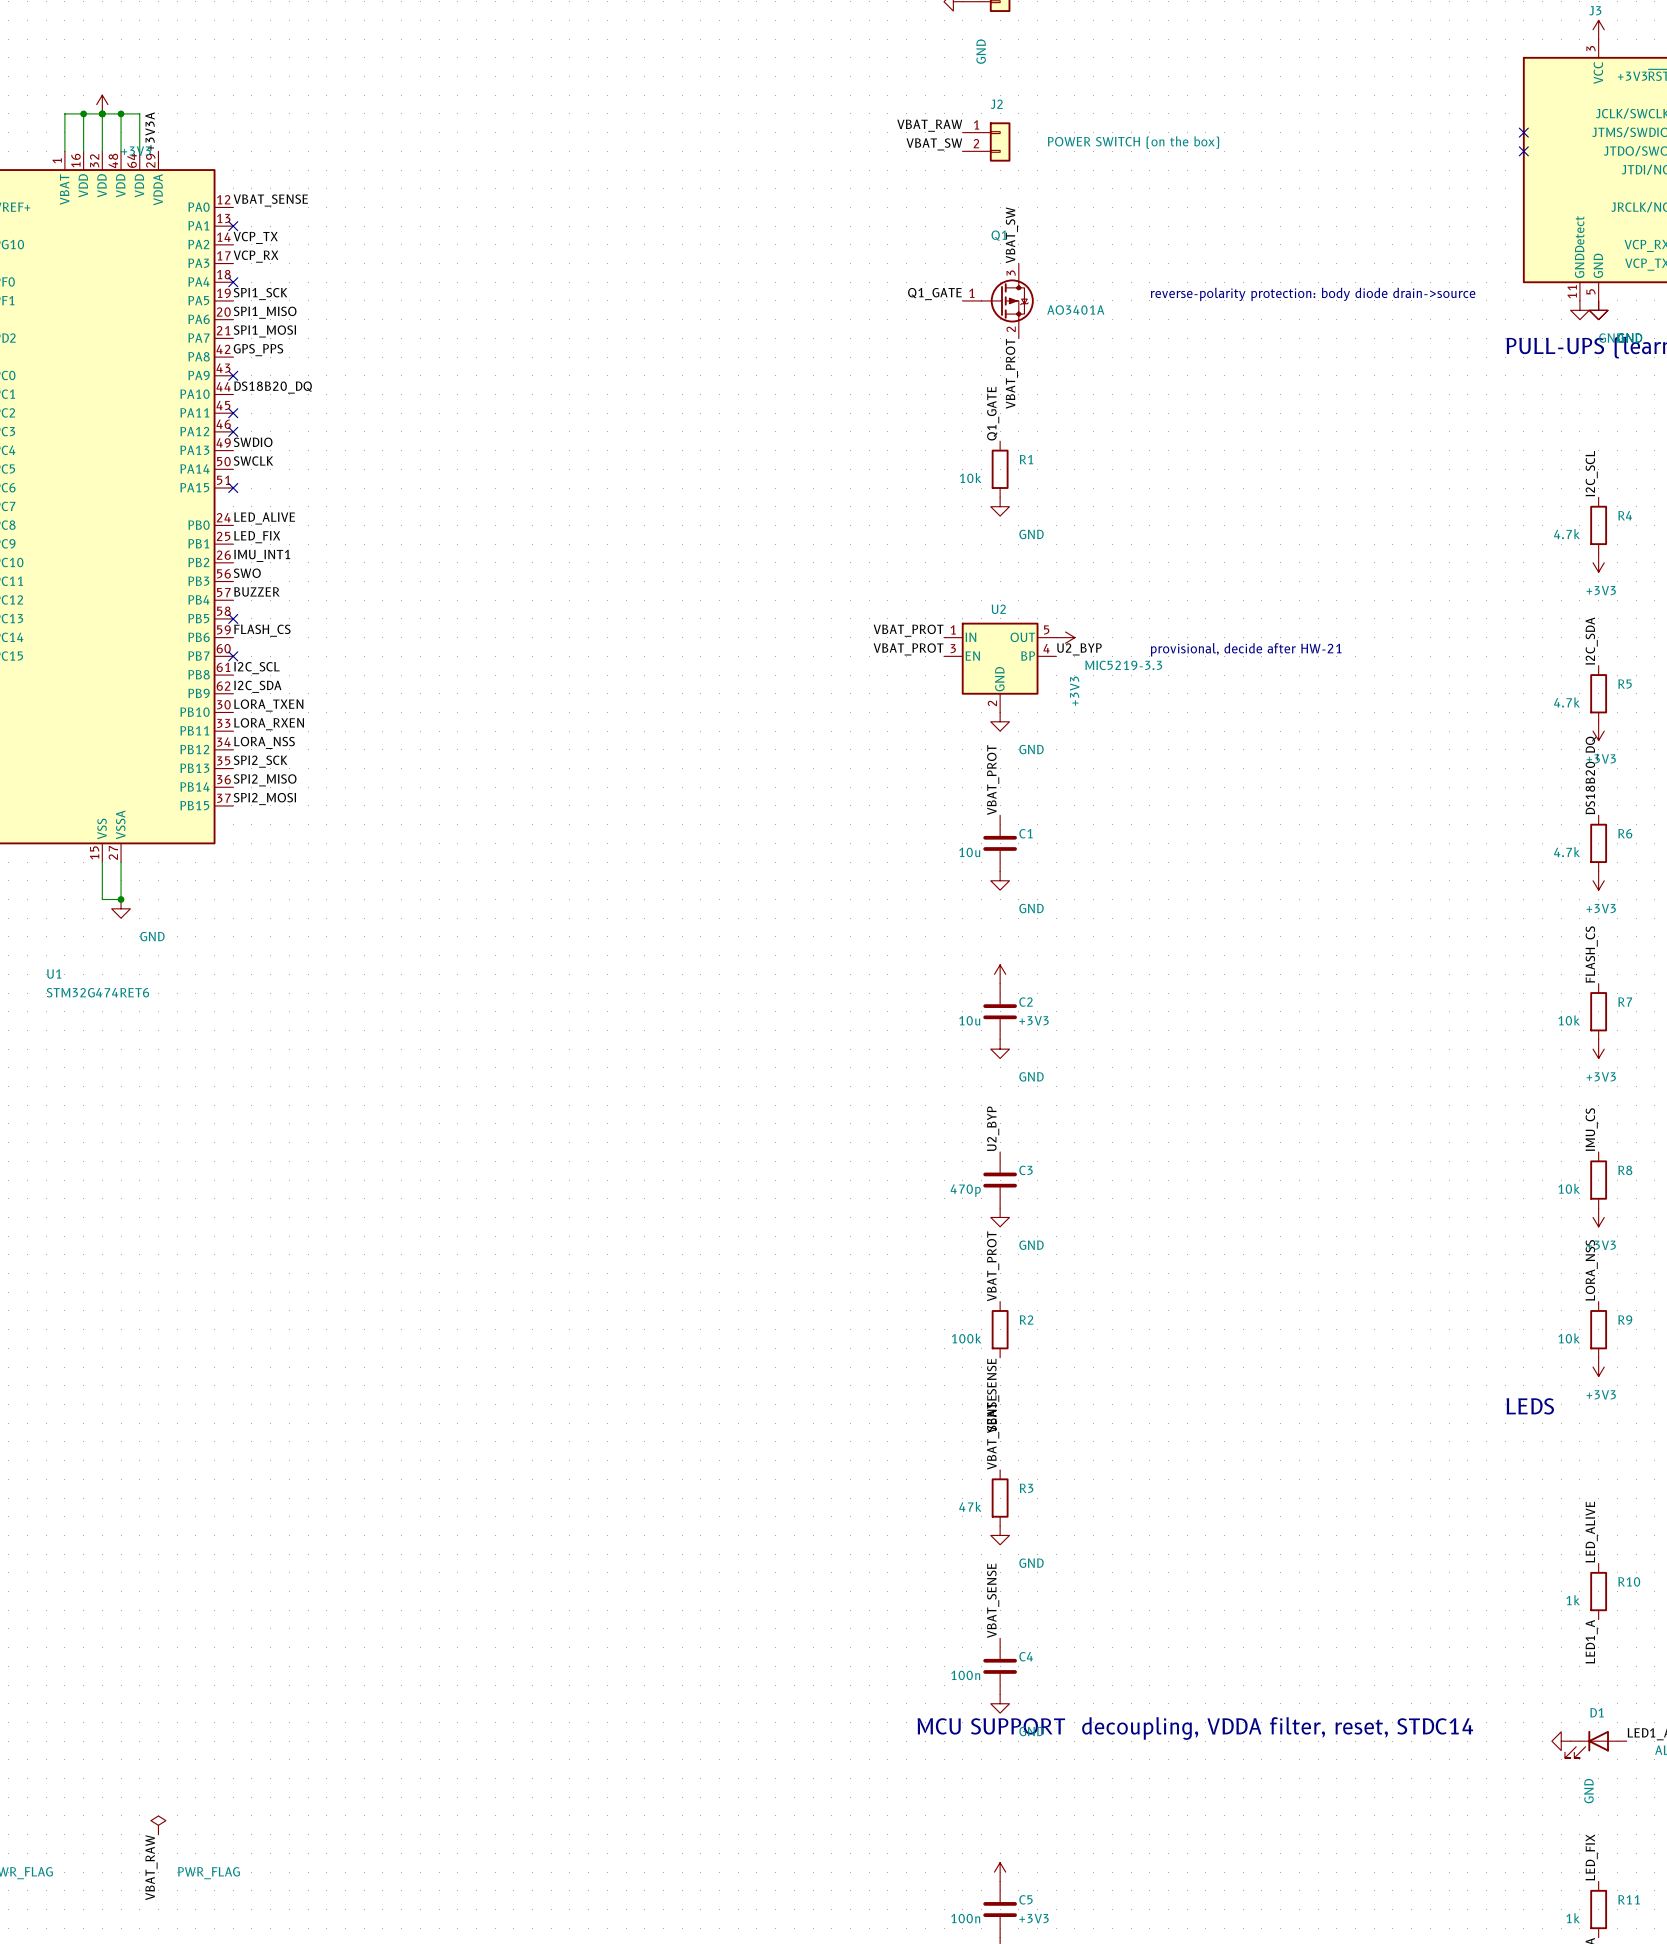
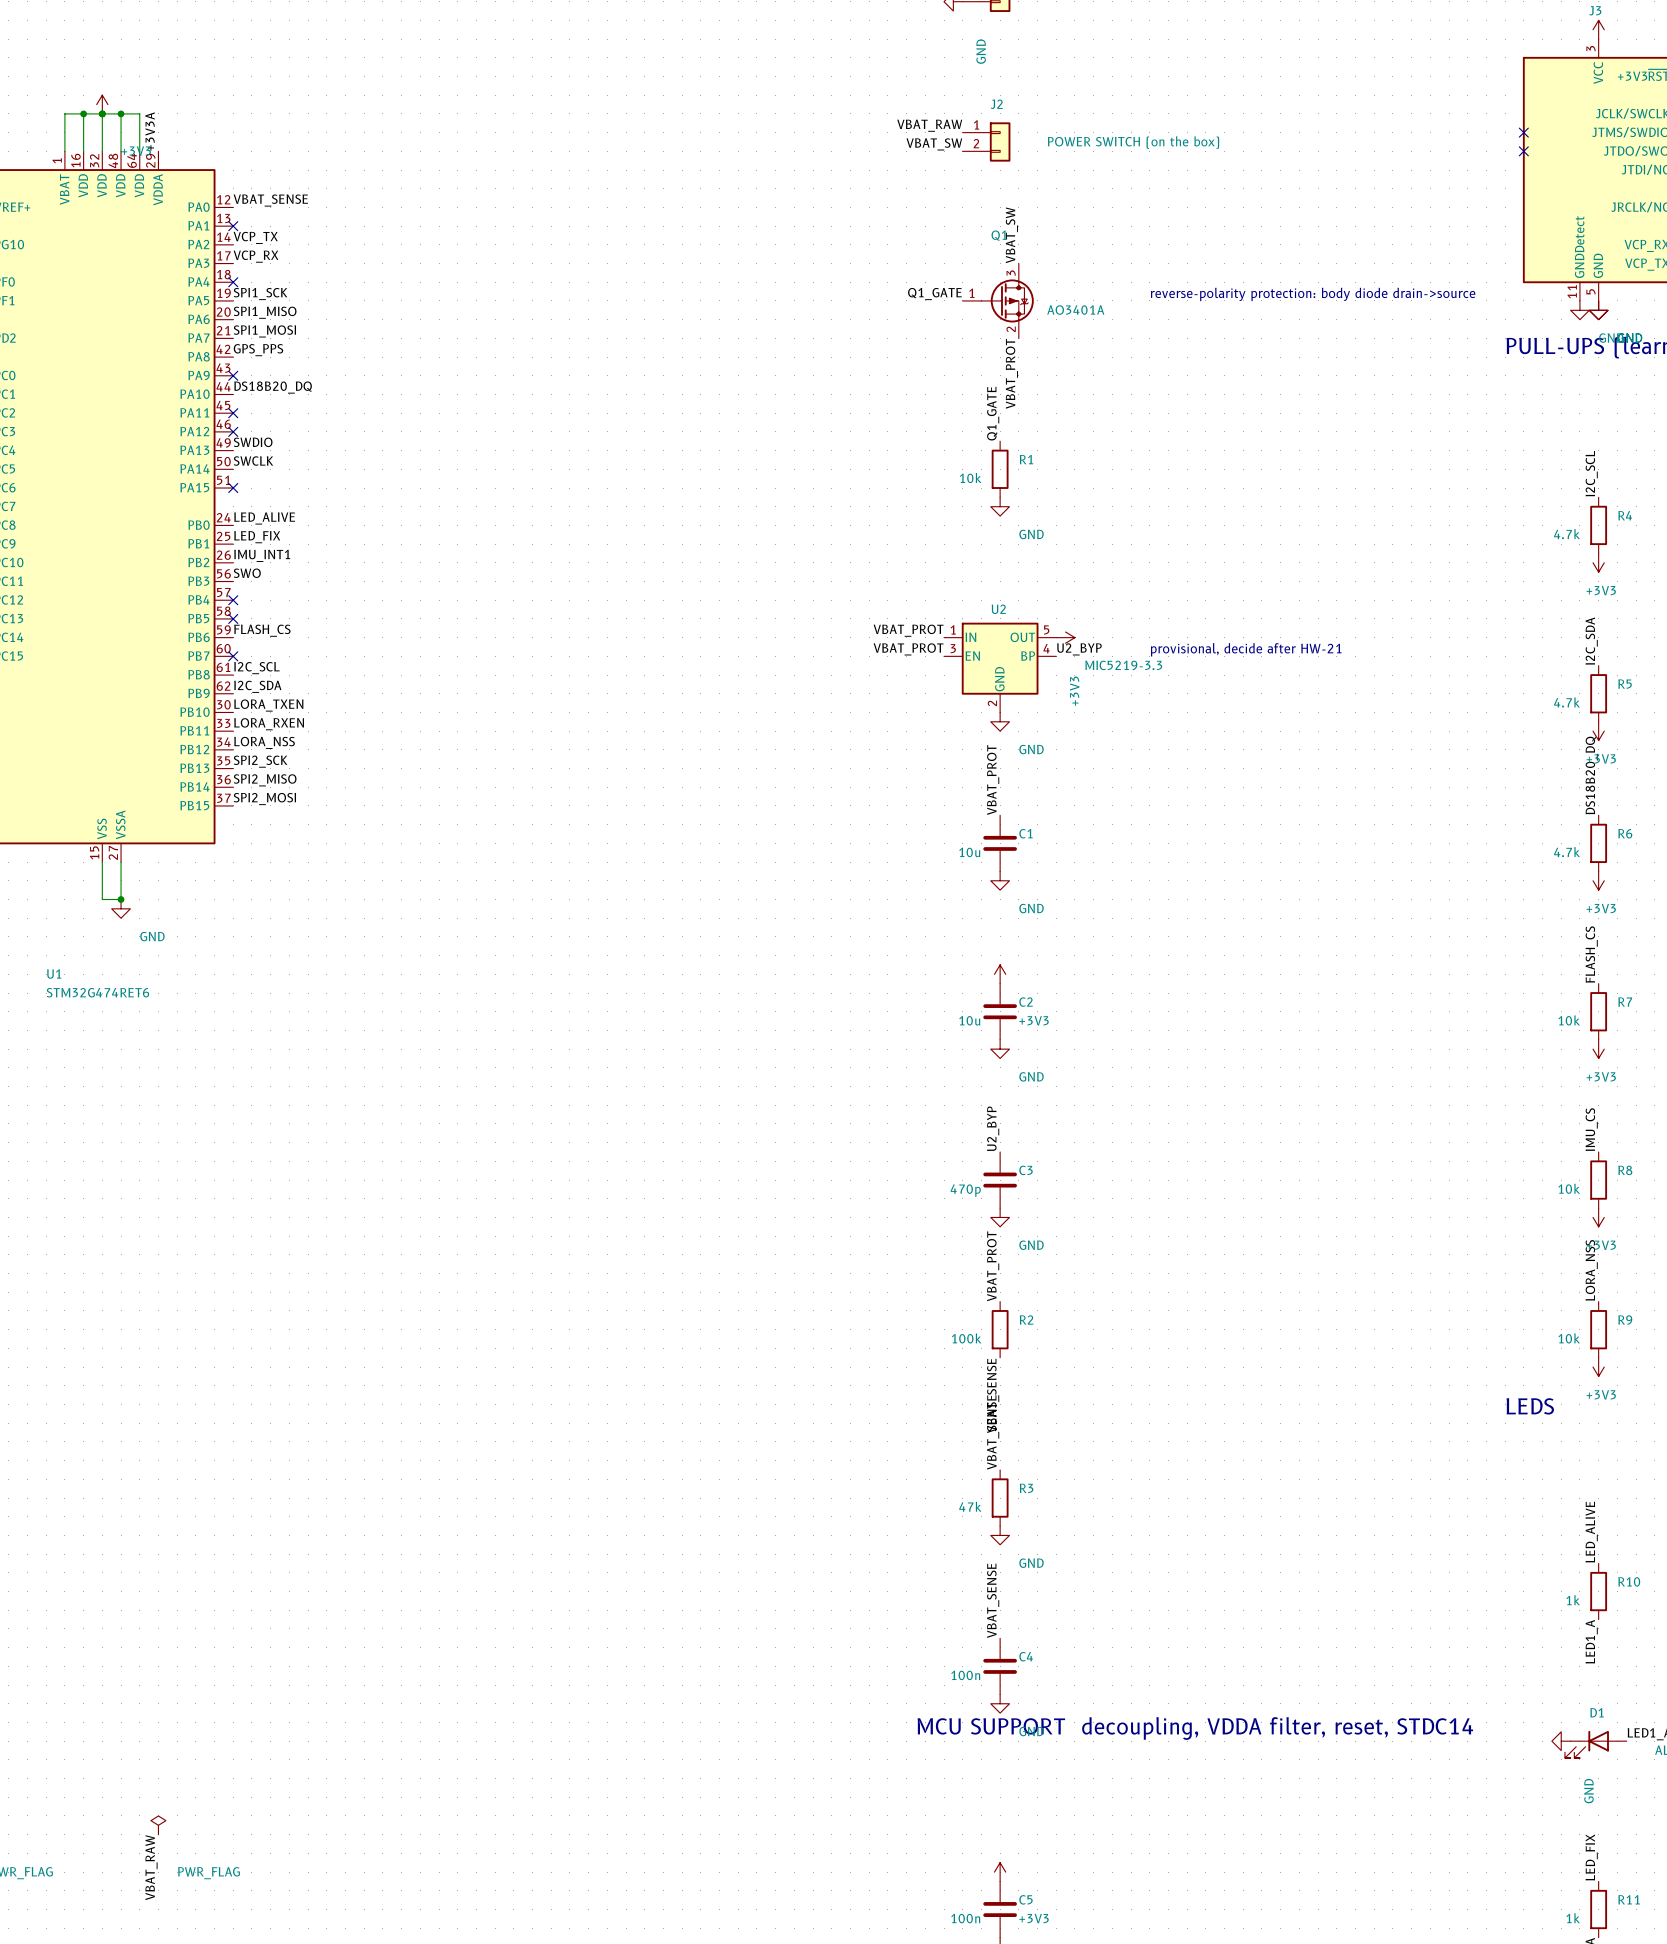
label: BUZZER (256, 591) -> none
no-connect mark: none -> (233, 600)

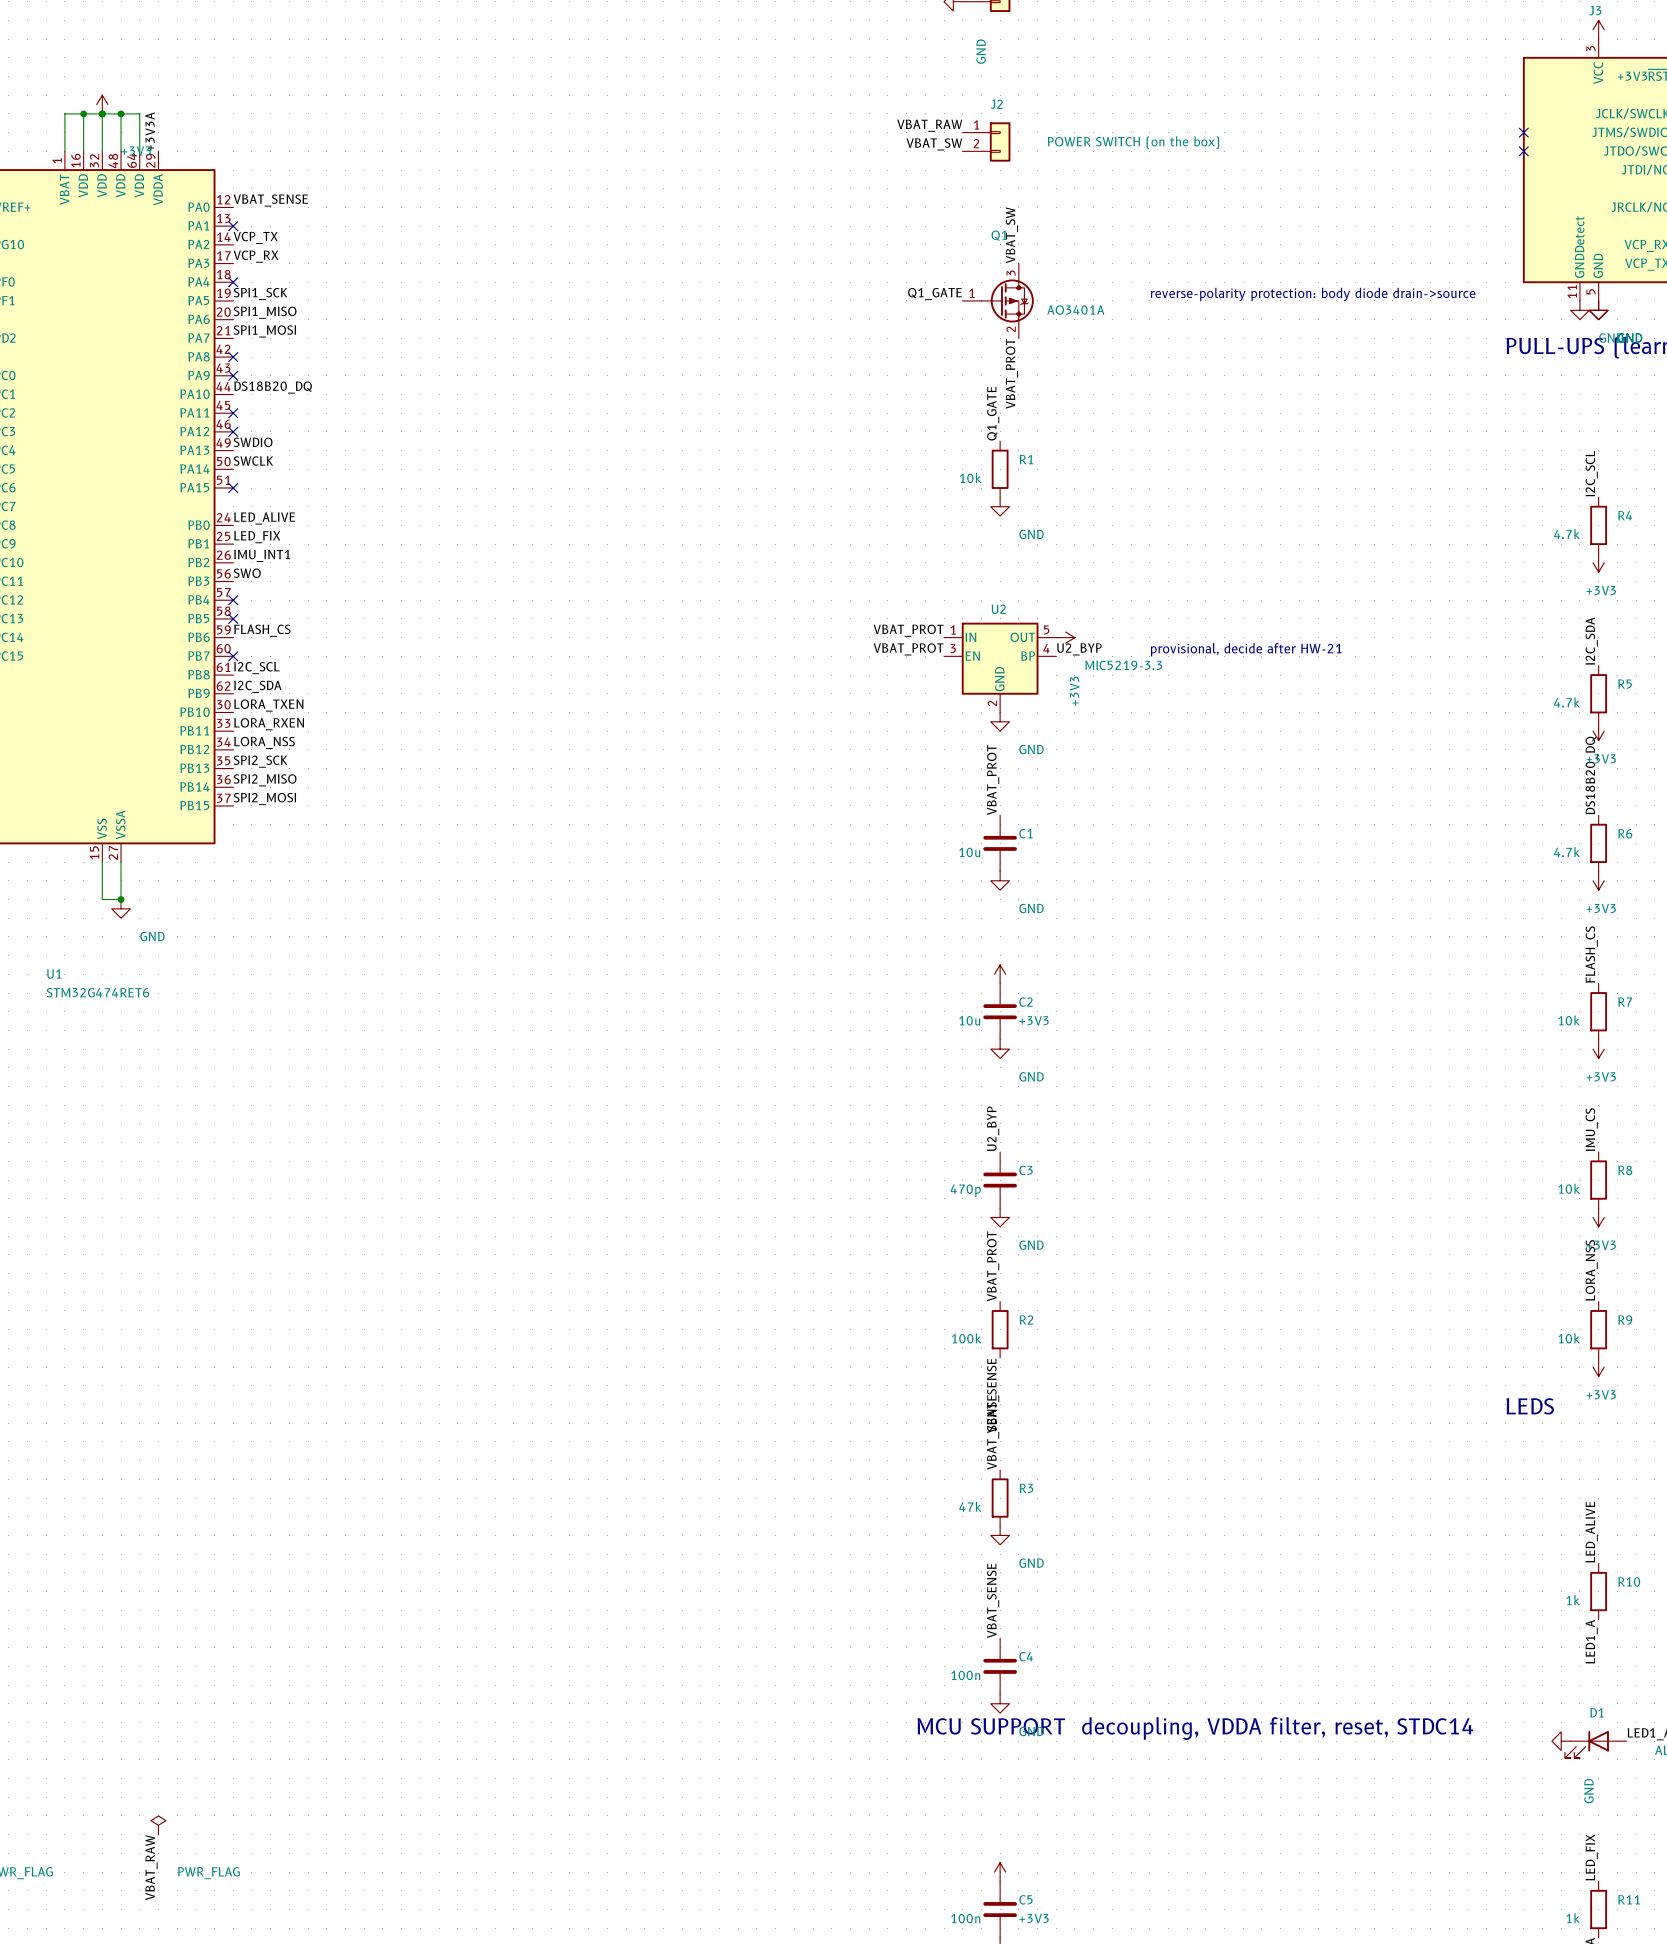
label: GPS_PPS (258, 350) -> none
no-connect mark: none -> (233, 357)

